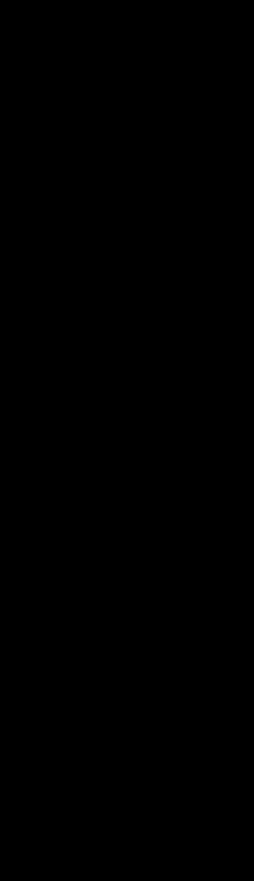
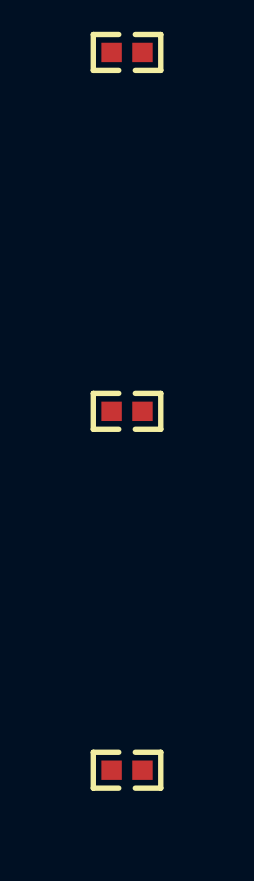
part: none -> (127, 52)
part: none -> (127, 411)
part: none -> (127, 770)

